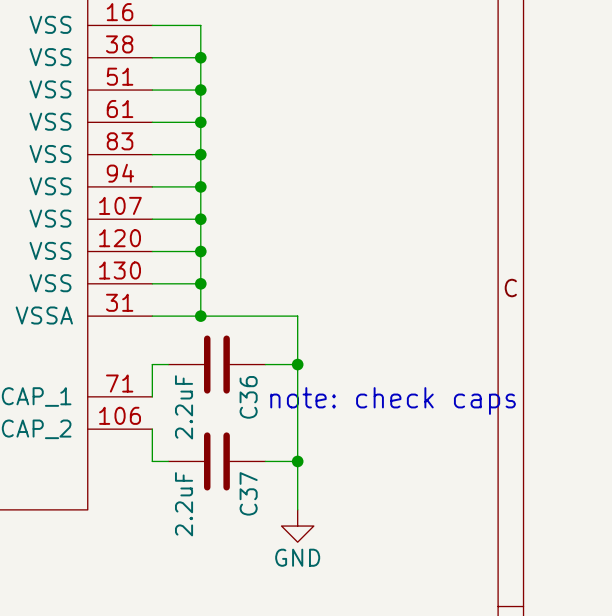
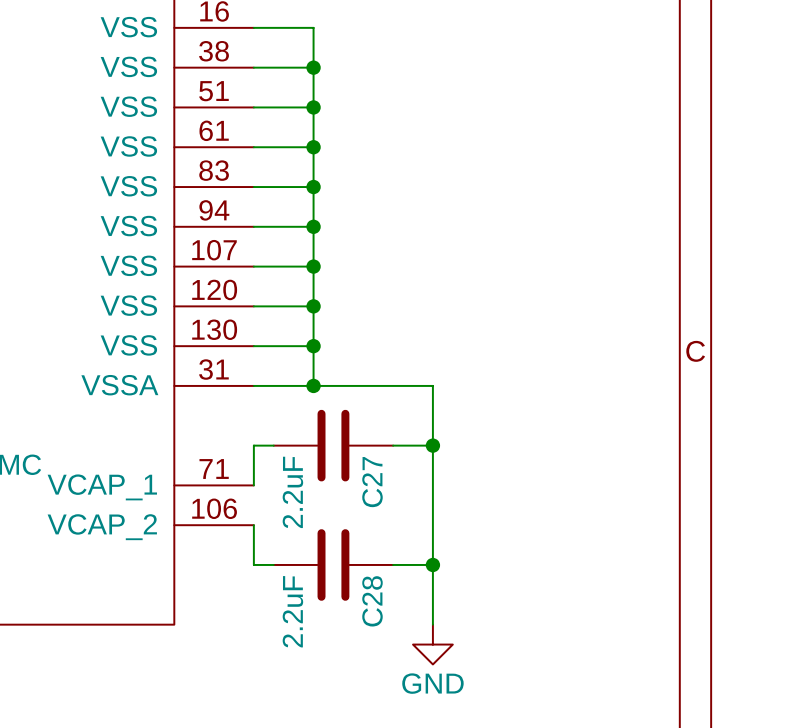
C36 name: C36 (248, 397) -> C27 (372, 482)
text: note: check caps (393, 400) -> none
C37 name: C37 (248, 493) -> C28 (372, 601)

